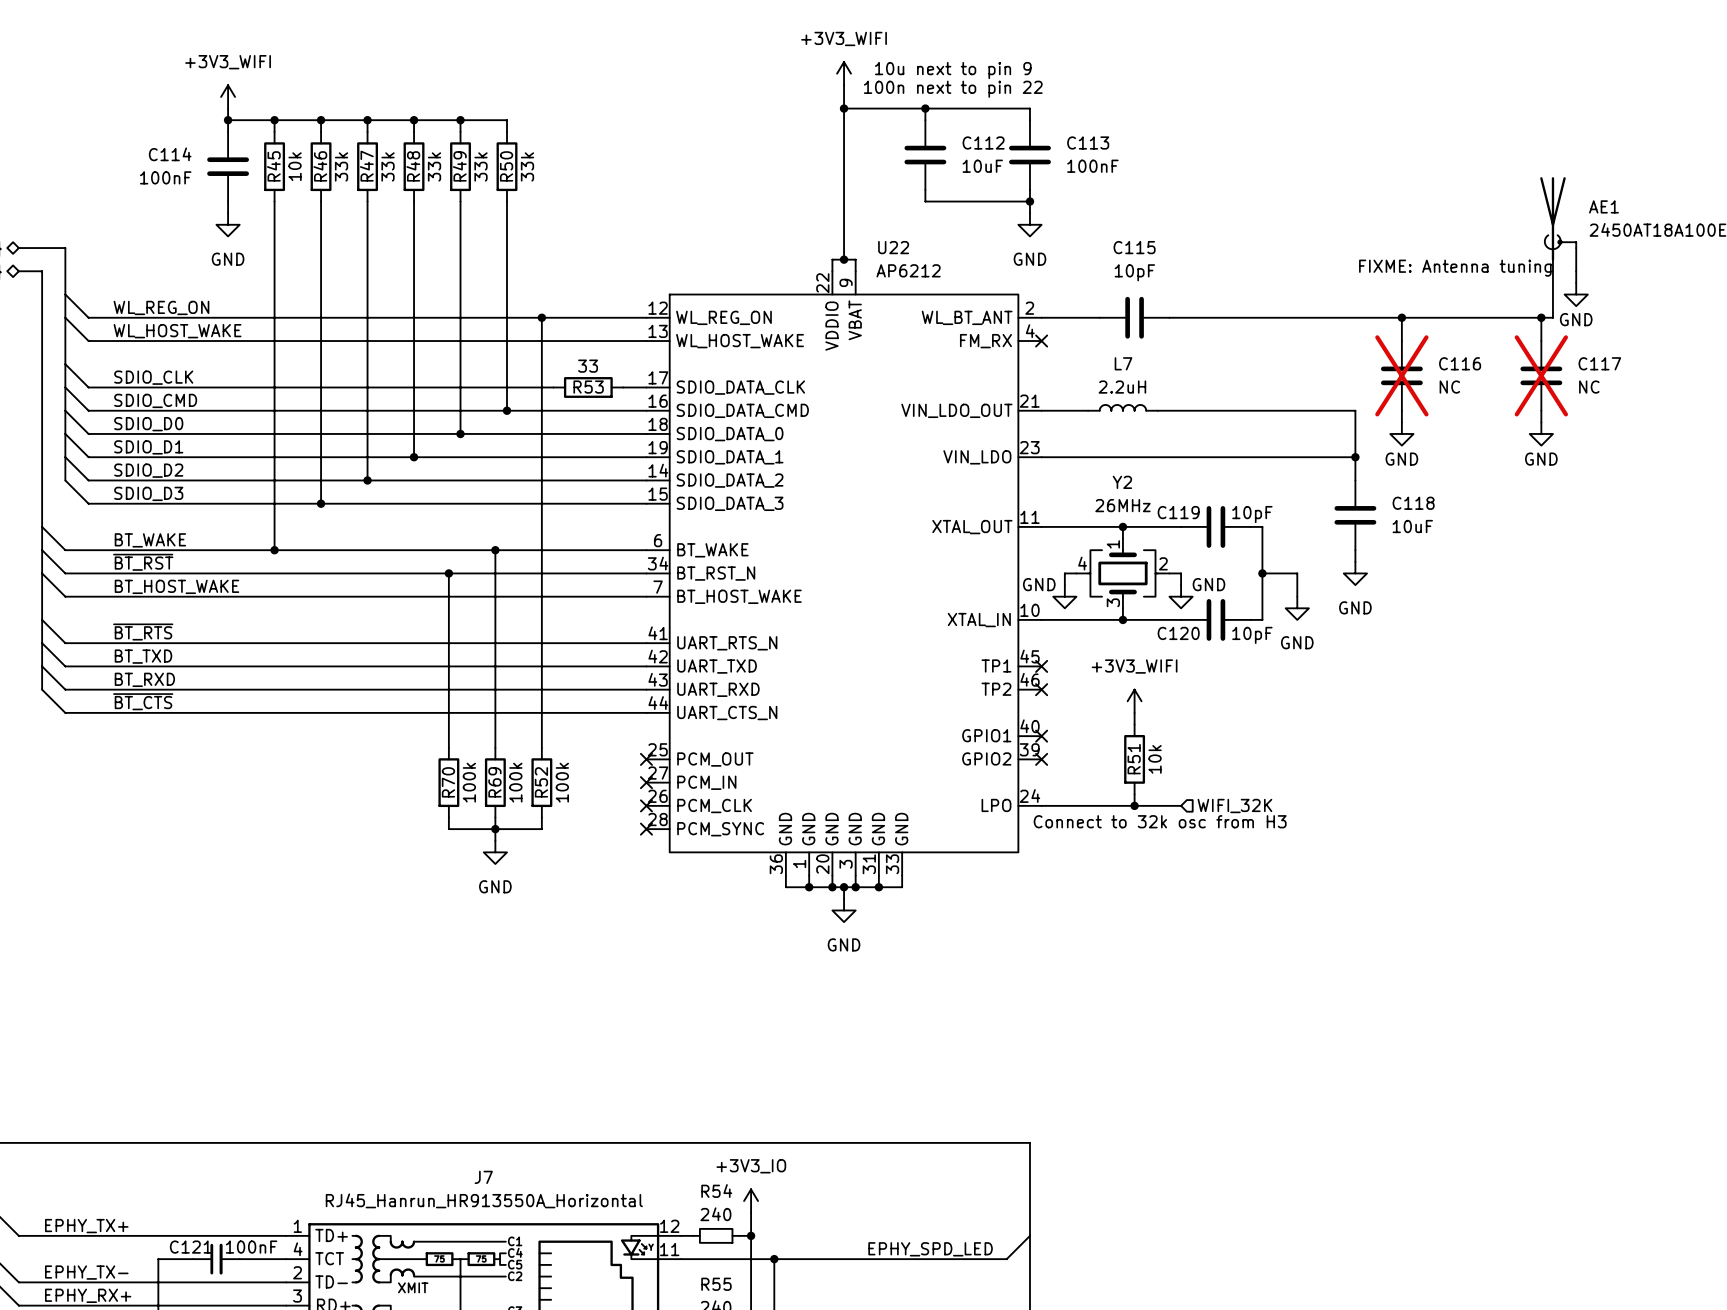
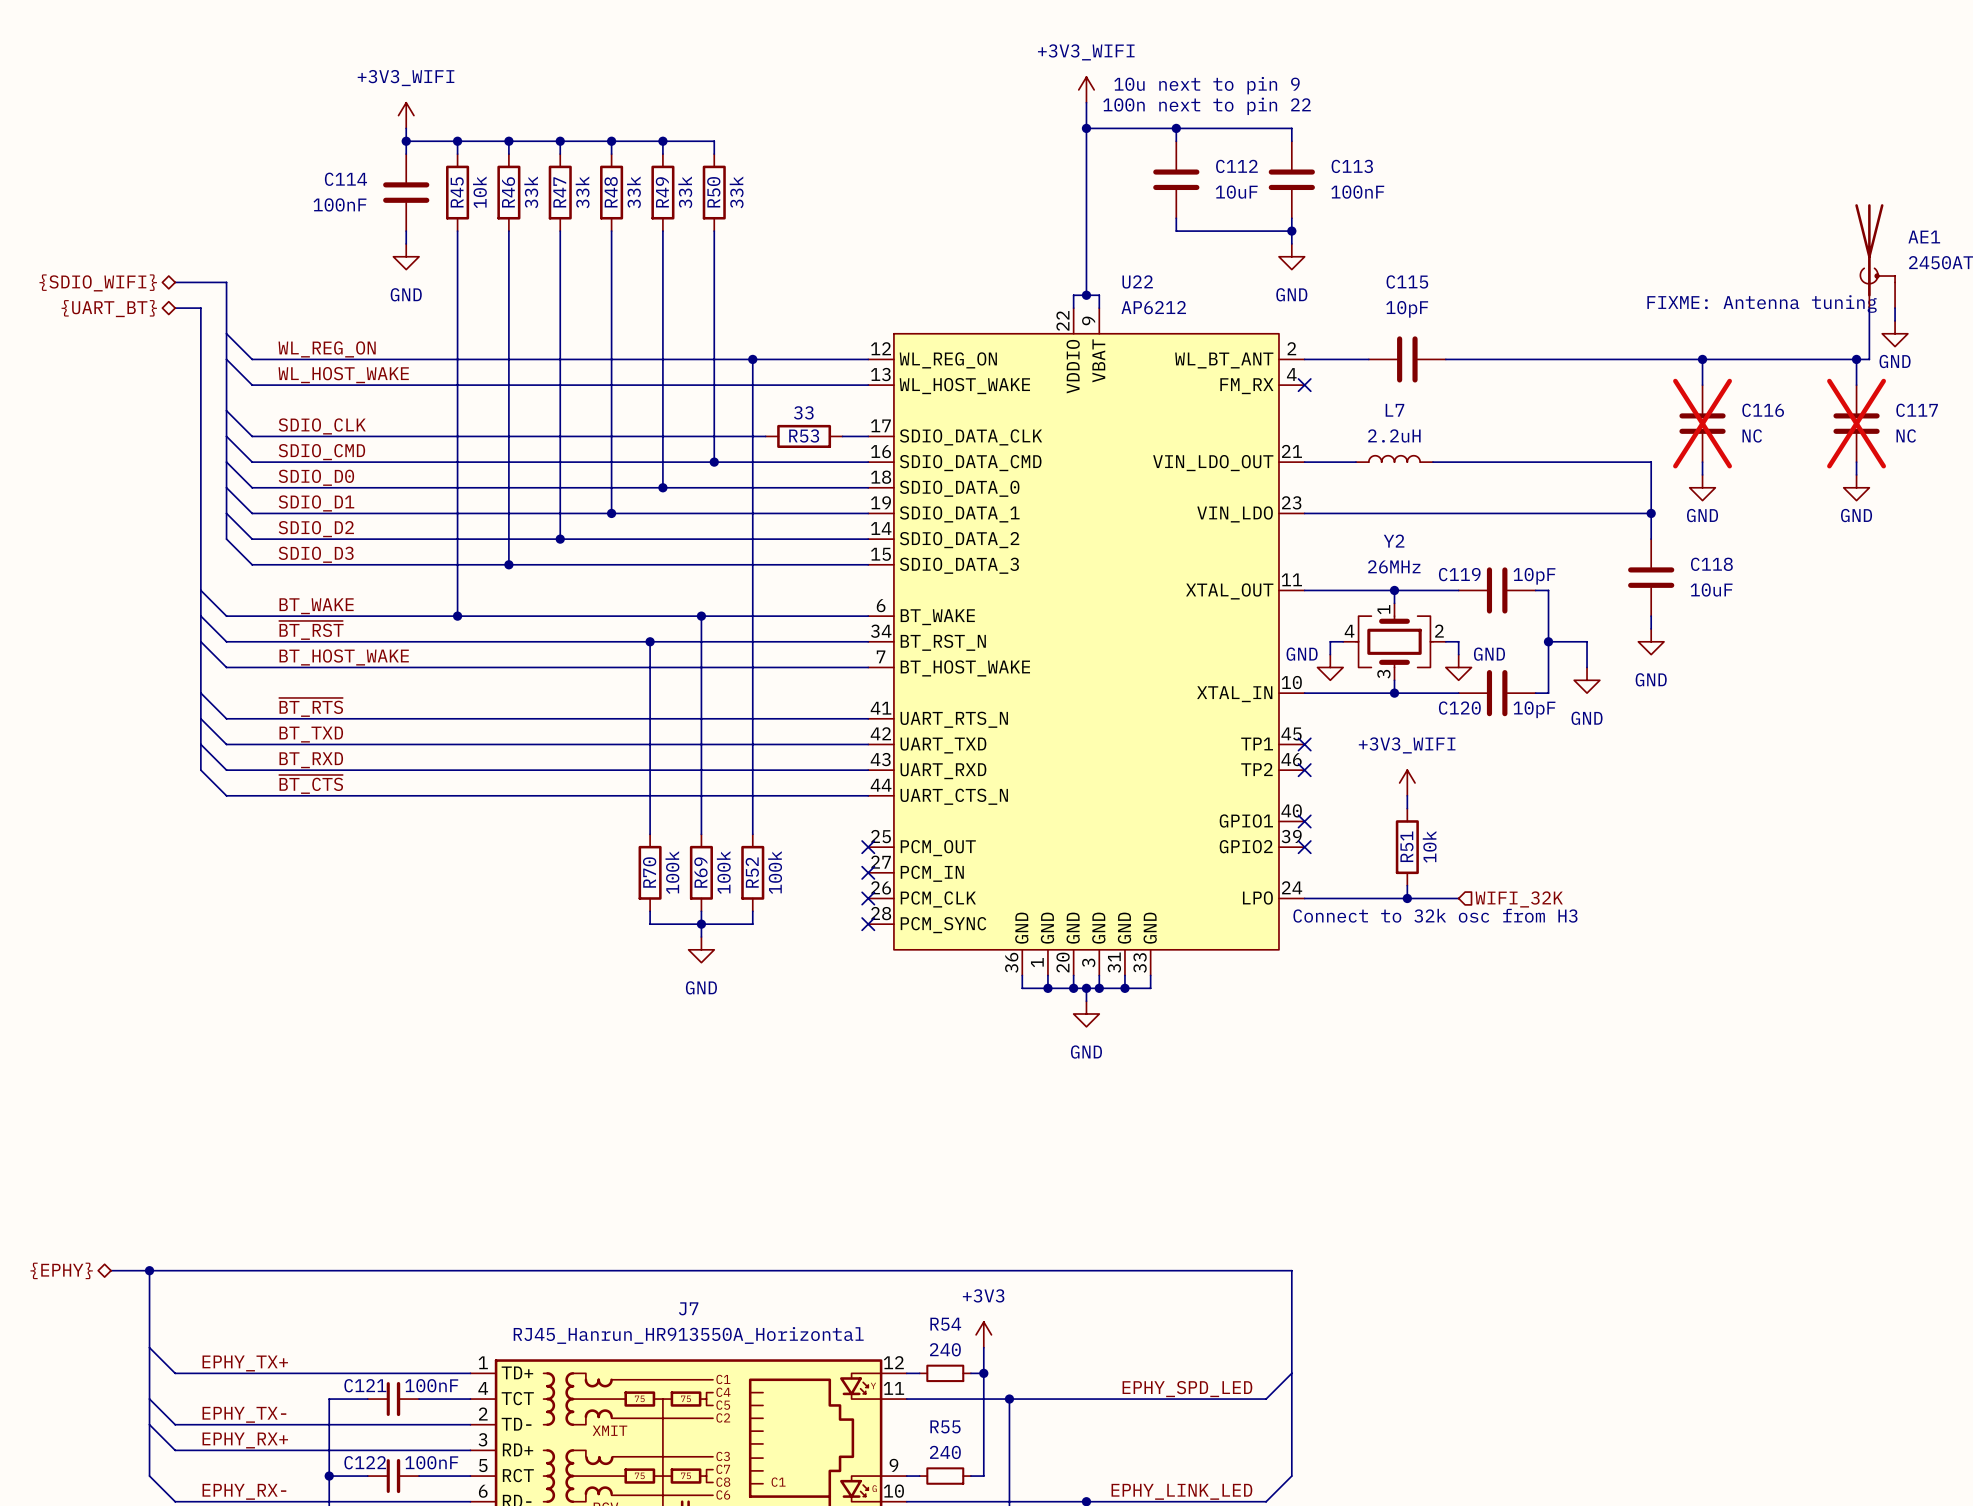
power symbol: +3V3_IO (751, 1201) -> +3V3 (983, 1334)

